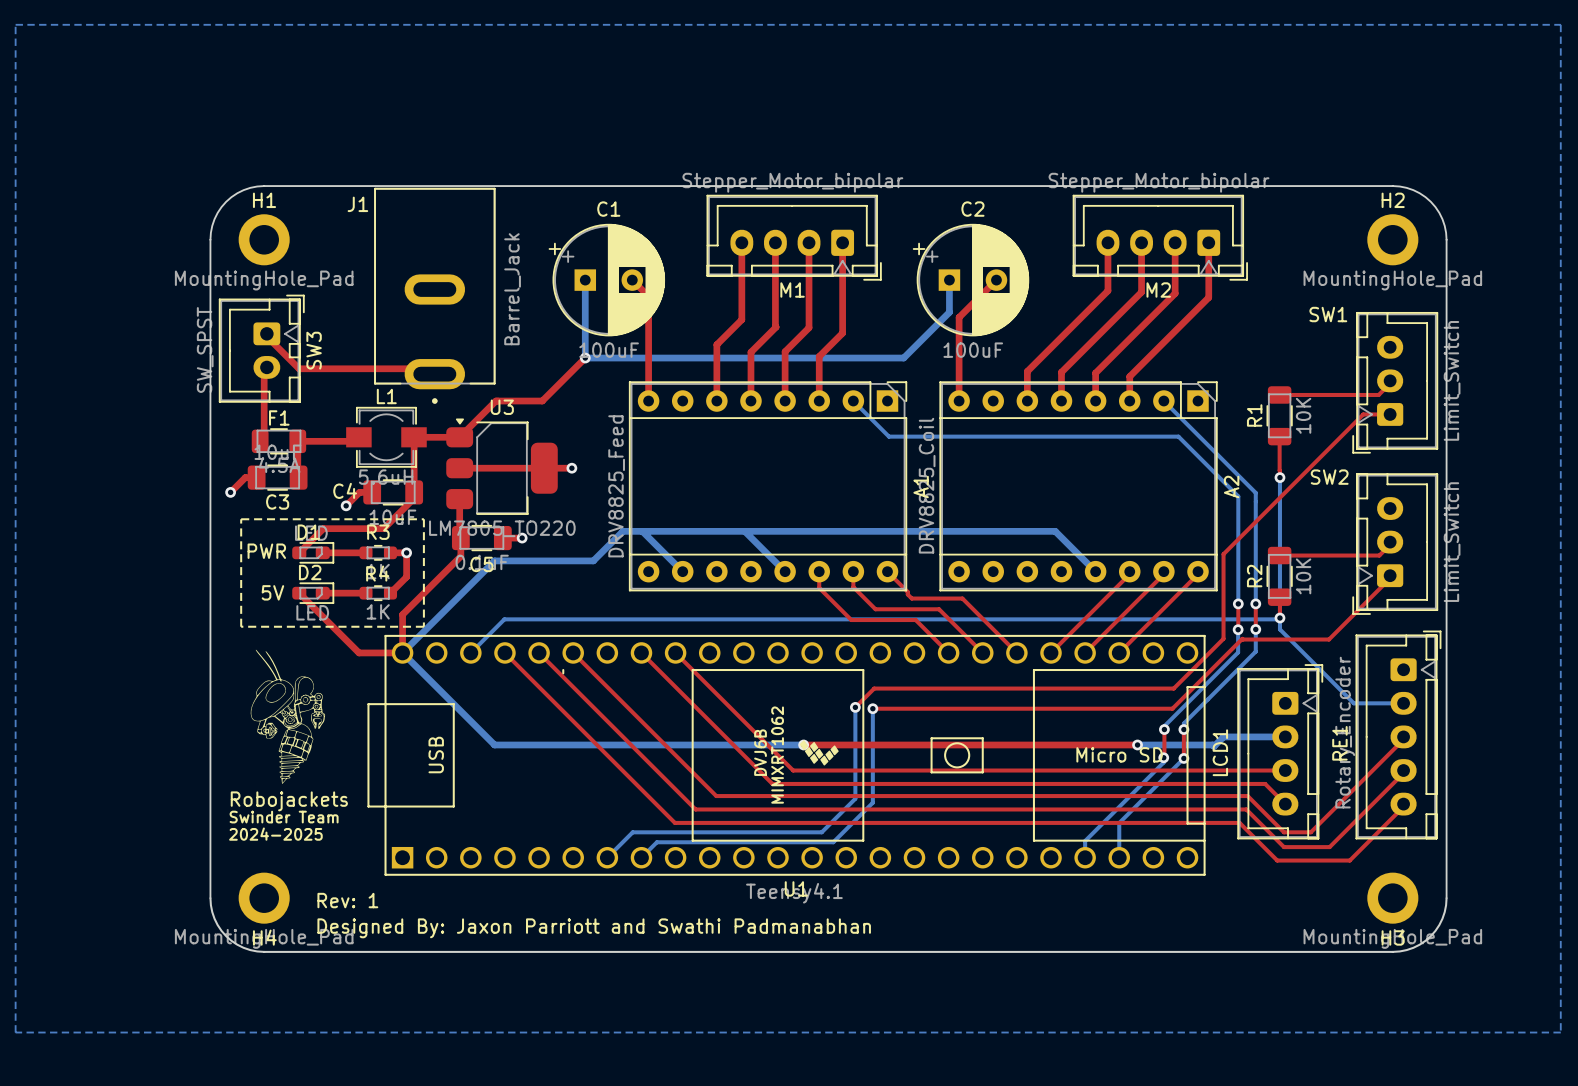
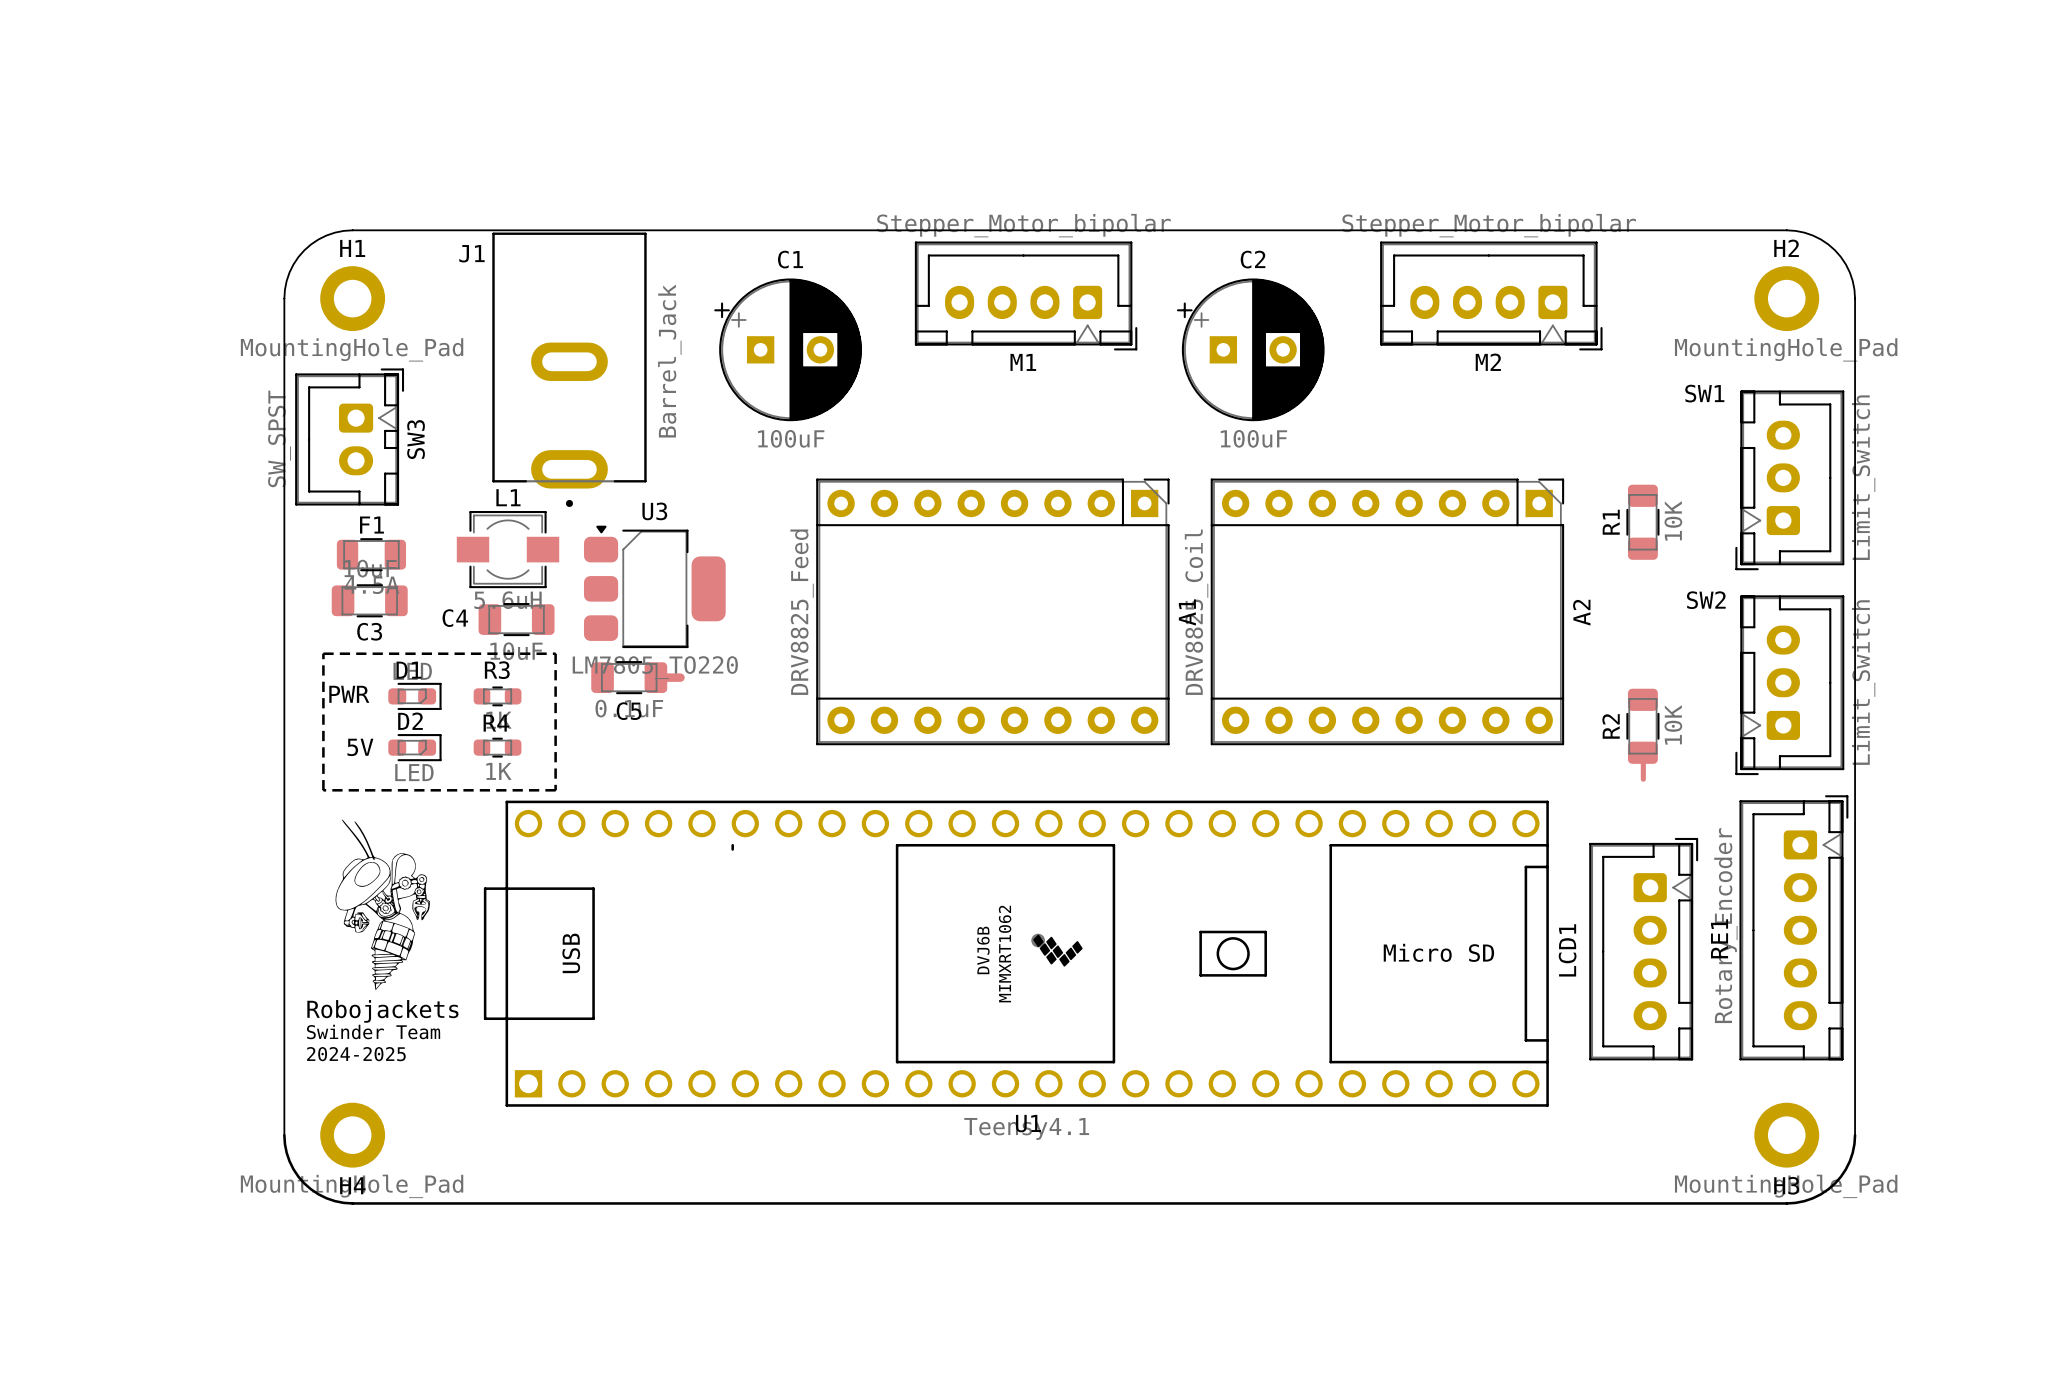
bottom zone outline: (15, 24) (1560, 24) (1560, 1032) (15, 1032) (15, 24) -> none
top track: (741, 240) (741, 319) (716, 344) (716, 401) -> none
top track: (775, 240) (776, 327) (750, 352) (750, 401) -> none
top track: (809, 240) (809, 327) (785, 351) (785, 401) -> none
top track: (842, 240) (842, 333) (819, 356) (819, 401) -> none
top track: (1107, 240) (1107, 290) (1027, 371) (1027, 401) -> none
top track: (1141, 240) (1141, 292) (1061, 372) (1061, 401) -> none
top track: (1175, 240) (1175, 293) (1095, 373) (1095, 401) -> none
top track: (1208, 240) (1208, 297) (1129, 376) (1129, 401) -> none
bottom track: (585, 280) (585, 357) (903, 358) (949, 312) (949, 280) -> none
top track: (632, 280) (648, 296) (648, 401) -> none
top track: (996, 280) (959, 317) (959, 401) -> none
top track: (264, 333) (299, 368) (434, 368) -> none
top track: (585, 358) (542, 401) (495, 401) (459, 437) (414, 437) -> none
via: (585, 358) -> none
top track: (264, 367) (264, 437) (260, 441) -> none
top track: (1392, 380) (1378, 394) (1279, 394) -> none
bottom track: (853, 401) (888, 436) (1178, 436) (1238, 496) (1238, 603) -> none
bottom track: (1163, 401) (1255, 492) (1255, 603) -> none
top track: (1392, 414) (1363, 414) (1223, 554) (1223, 638) (1173, 688) (874, 688) (855, 707) -> none
top track: (1279, 436) (1279, 477) -> none
top track: (358, 437) (354, 441) (297, 441) (298, 477) -> none
top track: (414, 437) (414, 498) (383, 528) (323, 528) (299, 552) -> none
top track: (459, 468) (571, 468) -> none
via: (571, 468) -> none
top track: (256, 477) (245, 477) (230, 492) -> none
bottom track: (1279, 477) (1279, 629) (1353, 703) (1406, 703) -> none
via: (1279, 477) -> none
via: (230, 492) -> none
top track: (372, 492) (359, 492) (346, 505) -> none
top track: (459, 499) (460, 556) (402, 614) (402, 652) (359, 652) (299, 593) -> none
via: (346, 505) -> none
bottom track: (642, 531) (682, 571) -> none
bottom track: (744, 531) (785, 571) -> none
via: (522, 538) -> none
top track: (1392, 542) (1379, 555) (1279, 555) -> none
top track: (322, 552) (365, 552) -> none
top track: (390, 552) (406, 552) (406, 577) (390, 593) -> none
via: (406, 552) -> none
top track: (819, 571) (819, 587) (851, 620) (915, 620) (948, 652) -> none
top track: (853, 571) (853, 587) (875, 609) (939, 609) (982, 652) -> none
top track: (887, 571) (911, 598) (962, 598) (1016, 652) -> none
bottom track: (1095, 571) (1055, 531) (622, 531) (593, 560) (494, 560) (402, 652) (494, 744) (803, 744) -> none
top track: (1129, 571) (1129, 574) (1051, 652) -> none
top track: (1163, 571) (1163, 574) (1085, 652) -> none
top track: (1198, 571) (1198, 574) (1119, 652) -> none
top track: (1392, 575) (1329, 639) (1242, 638) (1172, 708) (872, 708) -> none
top track: (322, 593) (365, 593) -> none
top track: (1238, 603) (1238, 629) -> none
via: (1238, 603) -> none
top track: (1255, 603) (1255, 629) -> none
via: (1255, 603) -> none
bottom track: (1279, 618) (504, 619) (470, 652) -> none
via: (1279, 618) -> none
bottom track: (1238, 629) (1238, 652) (1164, 726) (1164, 729) -> none
via: (1238, 629) -> none
bottom track: (1255, 629) (1255, 651) (1183, 723) (1183, 729) -> none
via: (1255, 629) -> none
U1 footprint: [367, 634, 1206, 876] -> [483, 800, 1549, 1107]
top track: (504, 652) (674, 822) (1239, 822) (1277, 860) (1349, 860) (1406, 804) -> none
top track: (539, 652) (695, 809) (1246, 809) (1283, 847) (1329, 847) (1406, 770) -> none
top track: (573, 652) (716, 796) (1247, 796) (1283, 832) (1310, 832) (1406, 736) -> none
top track: (641, 652) (772, 783) (1265, 783) (1285, 804) -> none
top track: (675, 652) (793, 770) (1285, 770) -> none
bottom track: (855, 707) (855, 798) (821, 832) (632, 832) (607, 857) -> none
via: (855, 707) -> none
bottom track: (872, 708) (872, 802) (833, 842) (656, 842) (641, 857) -> none
via: (872, 708) -> none
top track: (1164, 729) (1163, 757) -> none
via: (1164, 729) -> none
top track: (1183, 729) (1183, 758) -> none
via: (1183, 729) -> none
bottom track: (1285, 736) (1223, 736) (1214, 746) (1137, 744) -> none
top track: (803, 744) (1137, 744) -> none
via: (1137, 744) -> none
bottom track: (1163, 757) (1163, 762) (1085, 841) (1085, 857) -> none
via: (1163, 757) -> none
bottom track: (1183, 758) (1119, 823) (1119, 857) -> none
via: (1183, 758) -> none
text: Rev: 1 (347, 900) -> none
text: Designed By: Jaxon Parriott and Swathi Padmanabhan (594, 928) -> none

